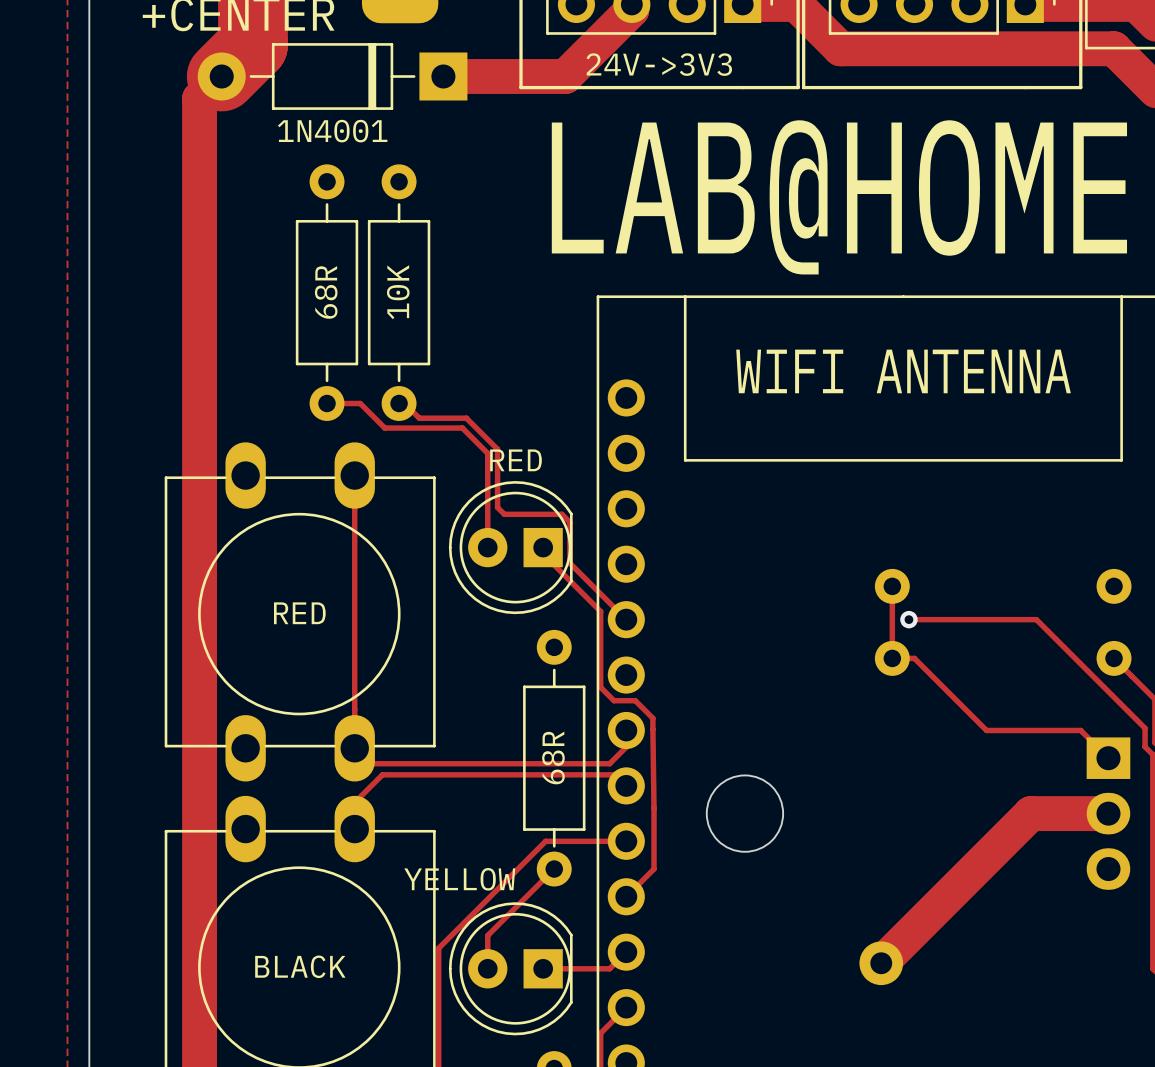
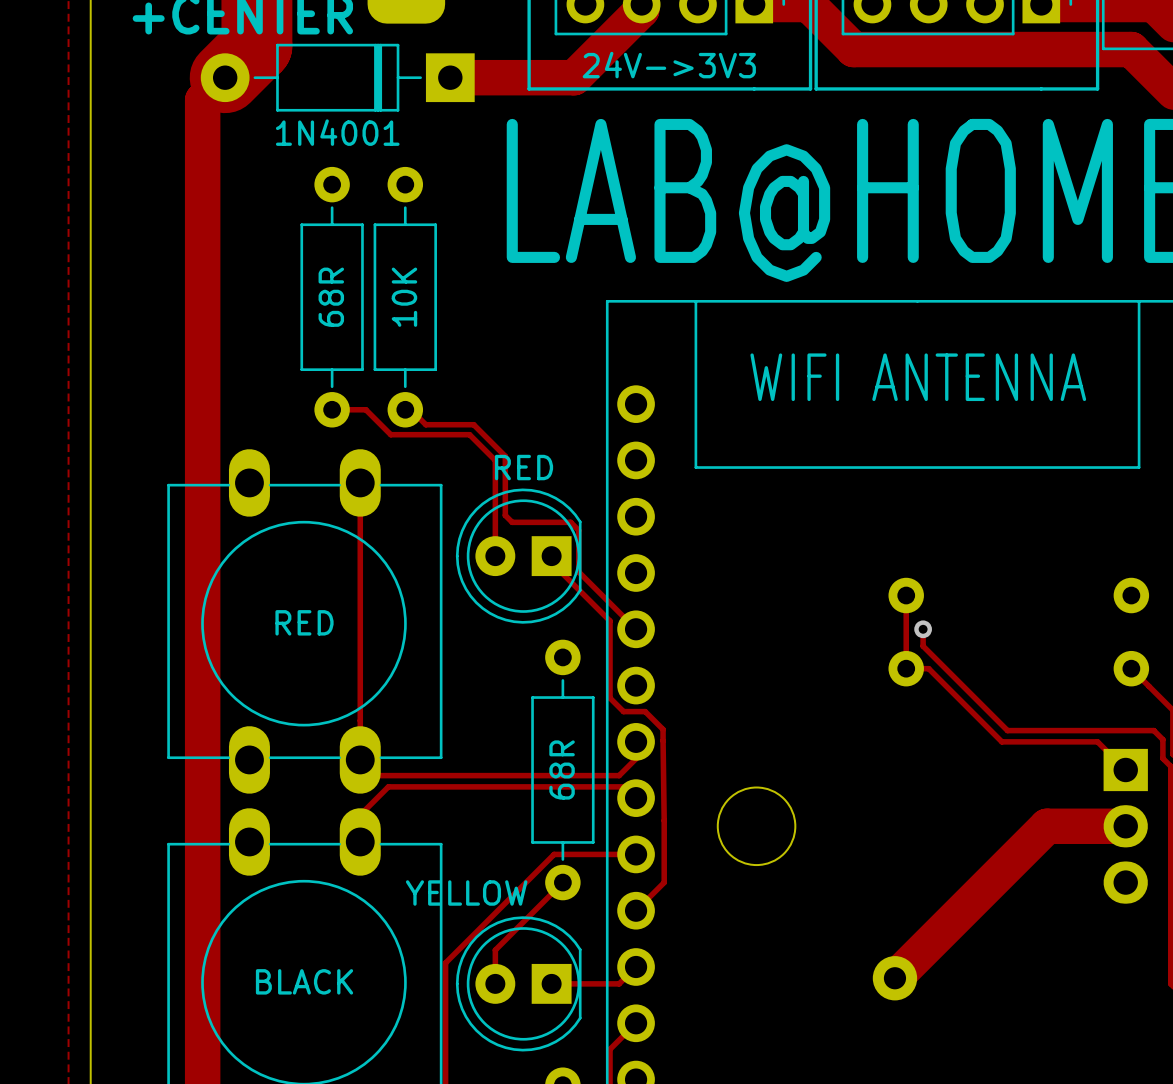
track: (908, 619) (1036, 619) (1136, 719) -> (923, 629) (923, 646) (1007, 730) (1153, 730)

